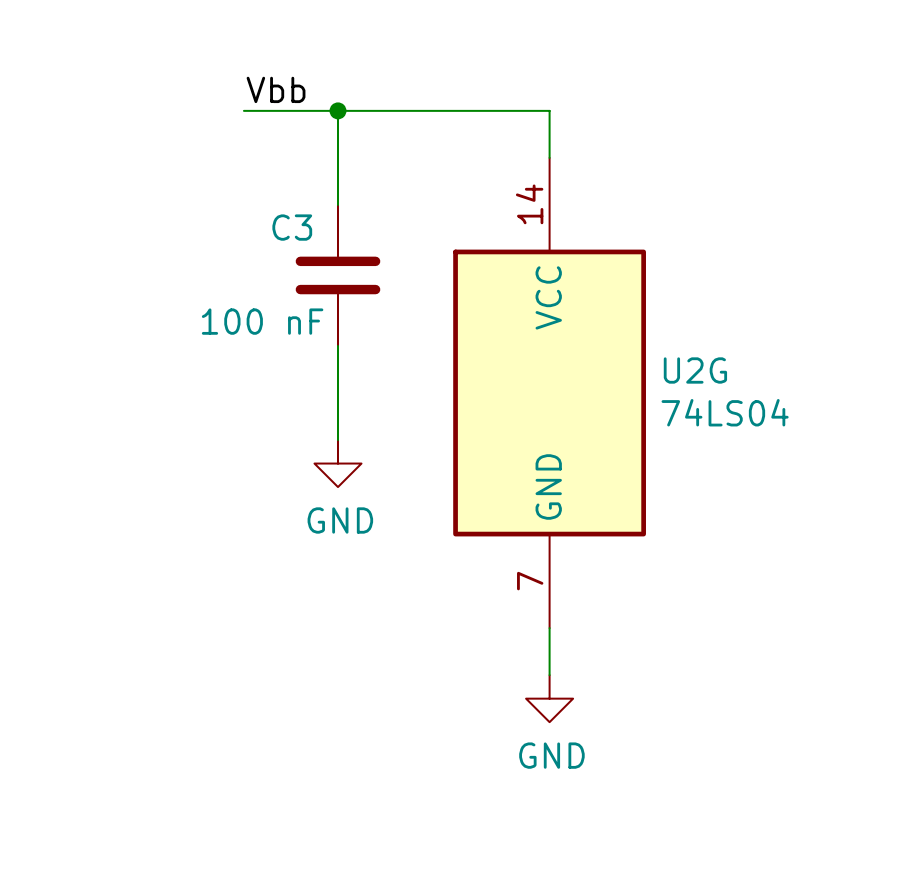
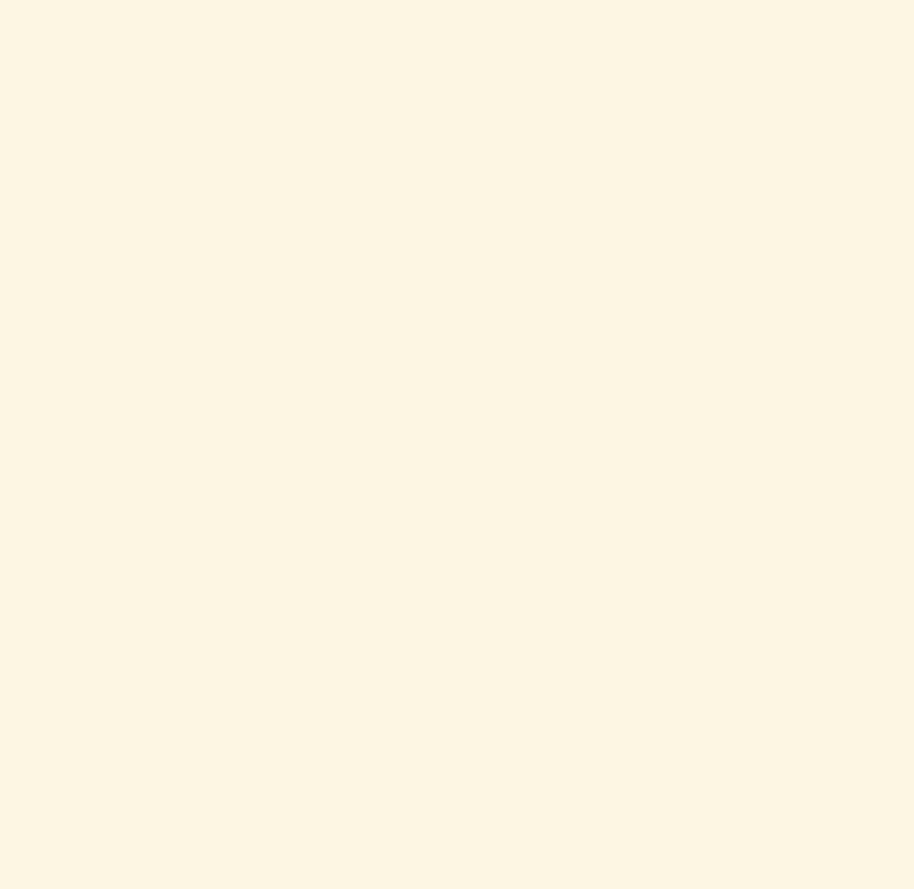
label: Vbb (276, 89) -> none
wire: (243, 110) (549, 110) (549, 157) -> none
wire: (337, 110) (337, 204) -> none
junction: (337, 110) -> none
C3: 100 nF (337, 275) -> none
wire: (337, 345) (337, 440) -> none
U2G: 74LS04 (549, 393) -> none
power symbol: GND (337, 463) -> none
wire: (549, 628) (549, 675) -> none
power symbol: GND (549, 698) -> none

